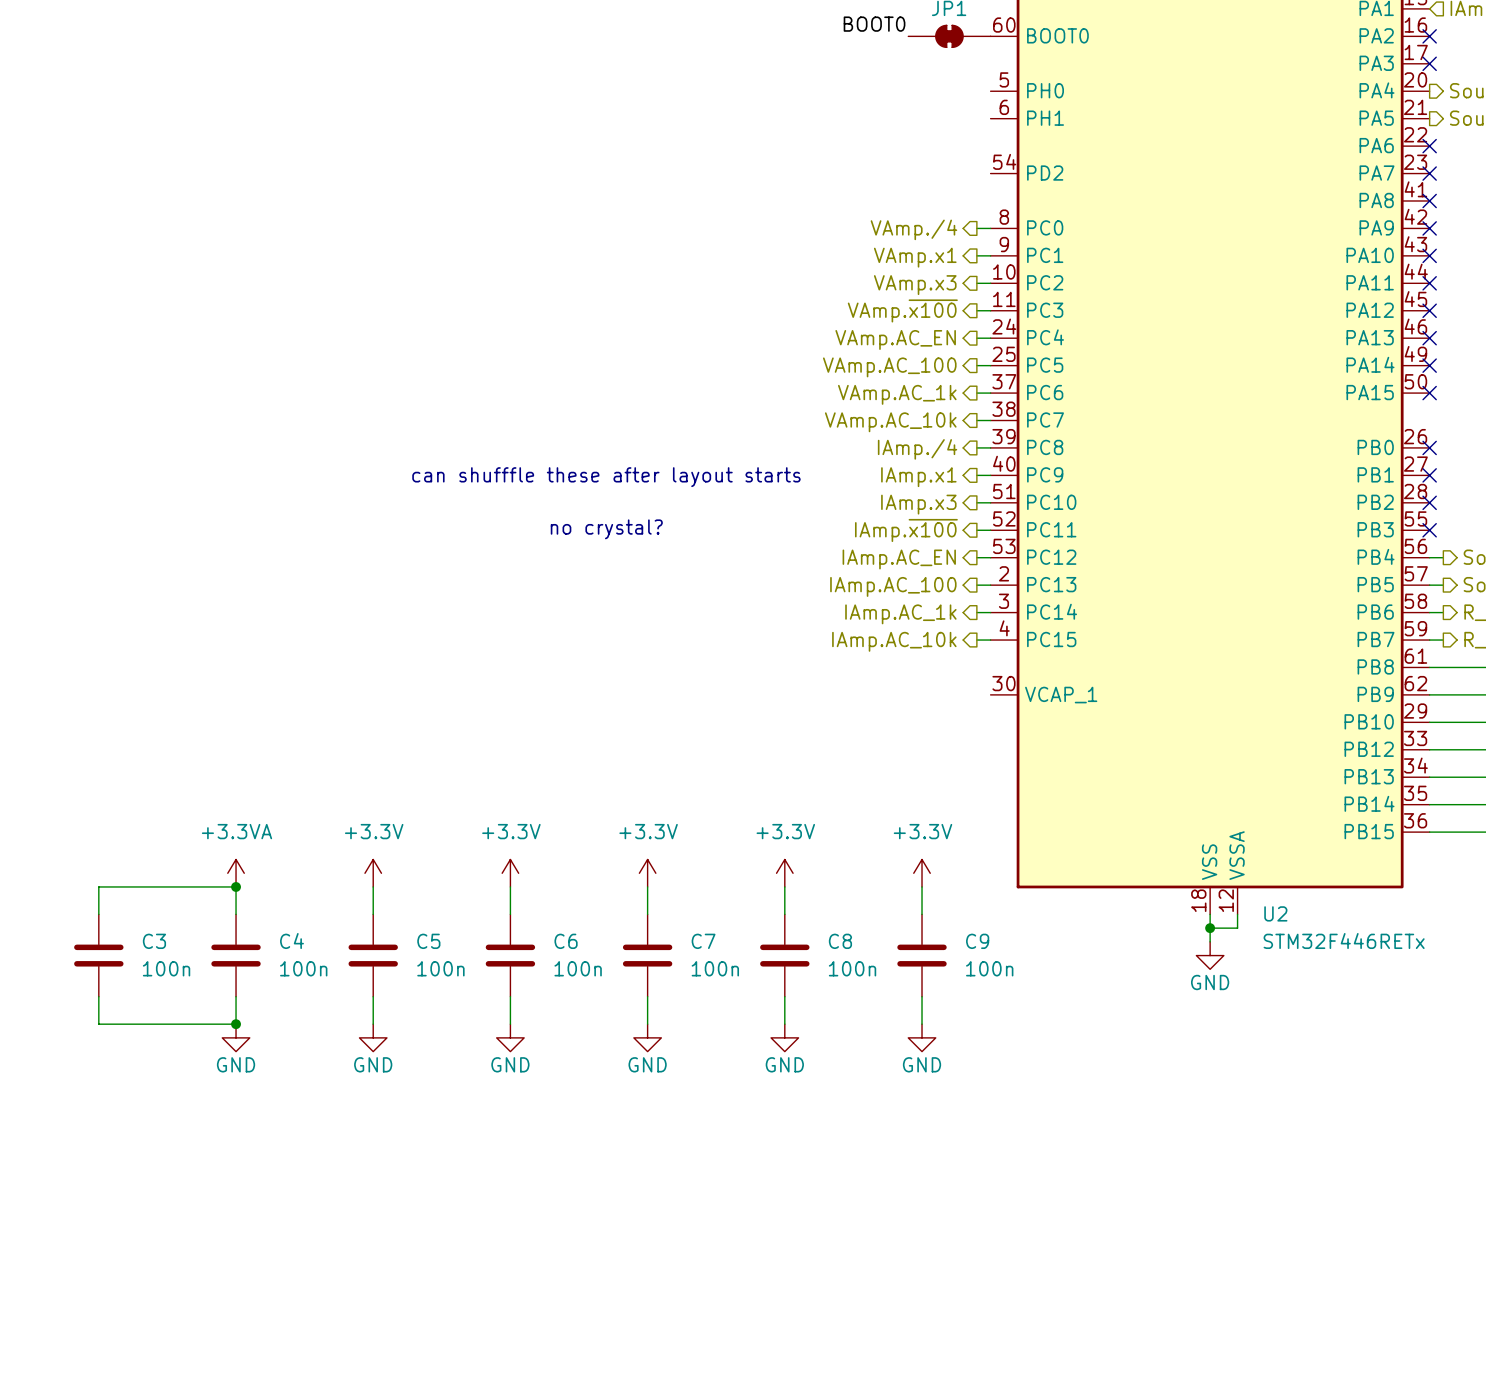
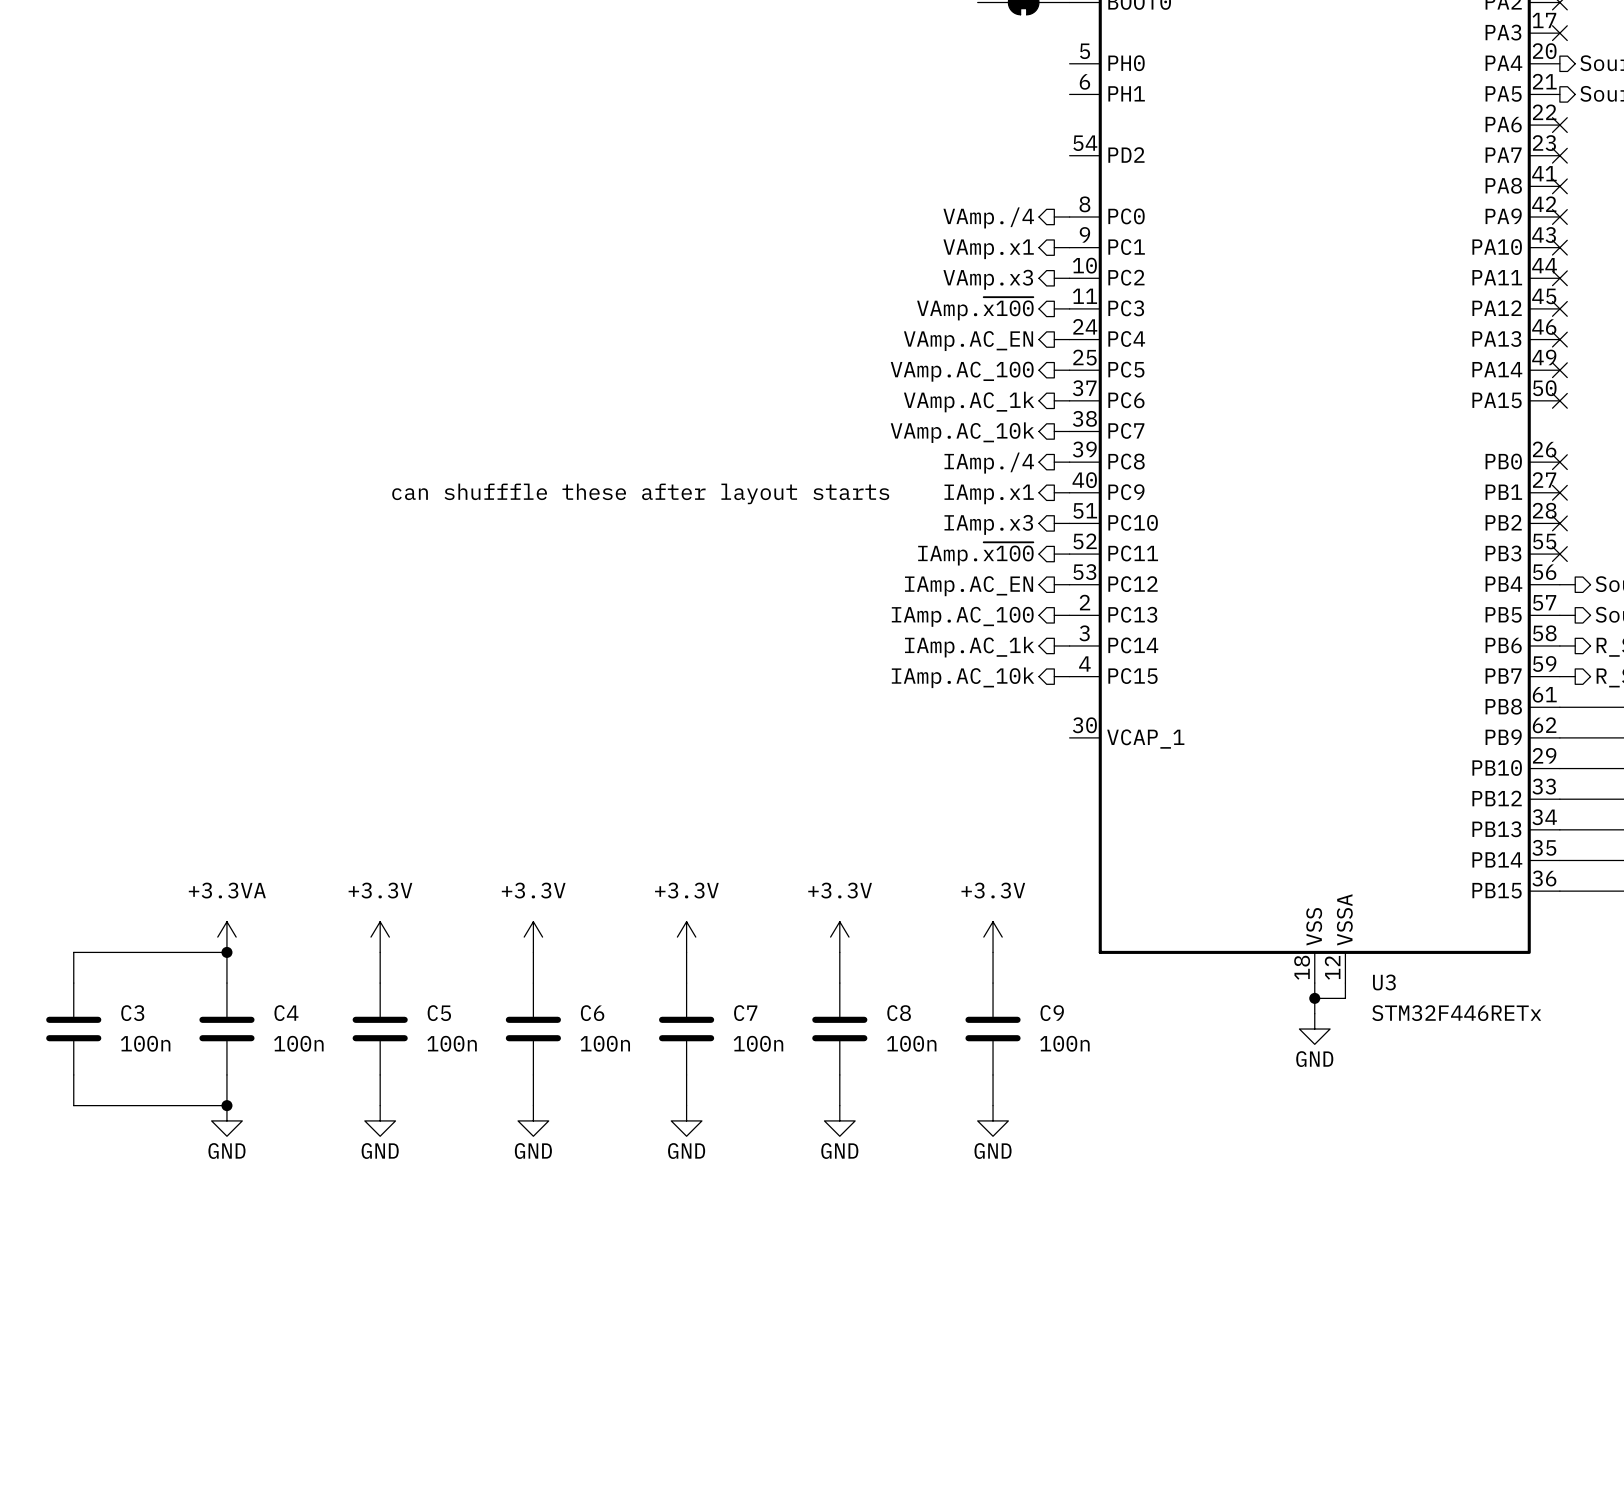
text: no crystal? (606, 529) -> none
U2 name: U2 (1275, 913) -> U3 (1384, 982)

